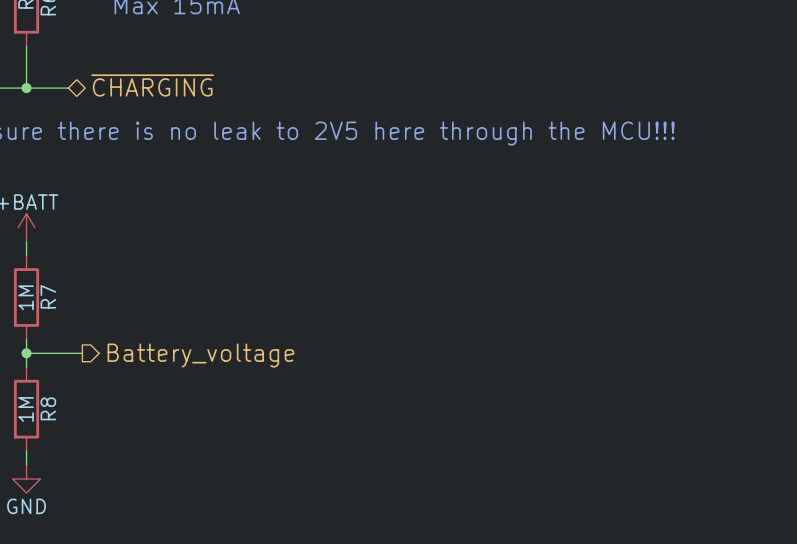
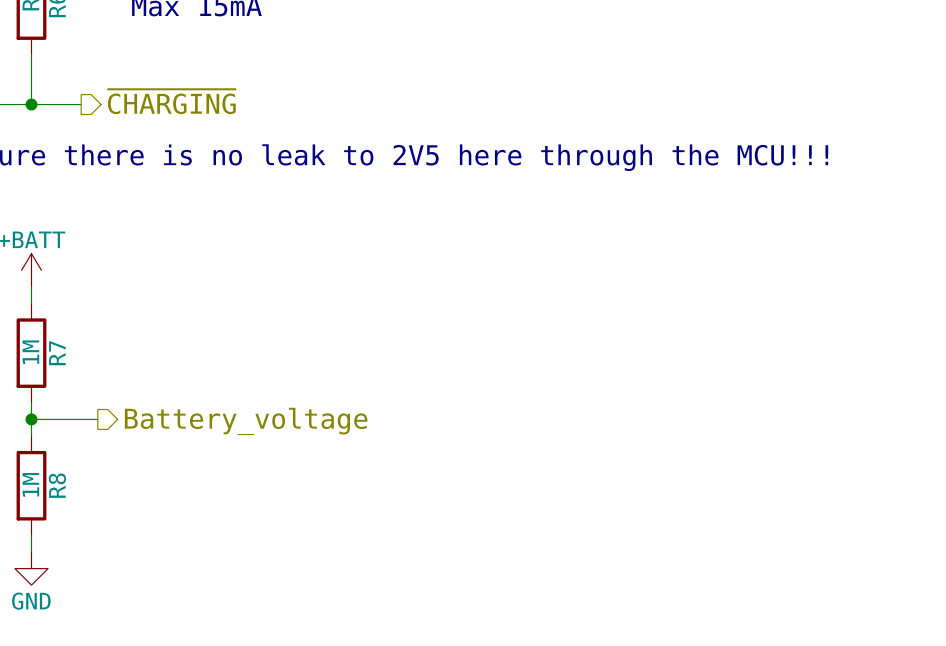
hierarchical label shape: bidirectional (152, 85) -> output (171, 101)

